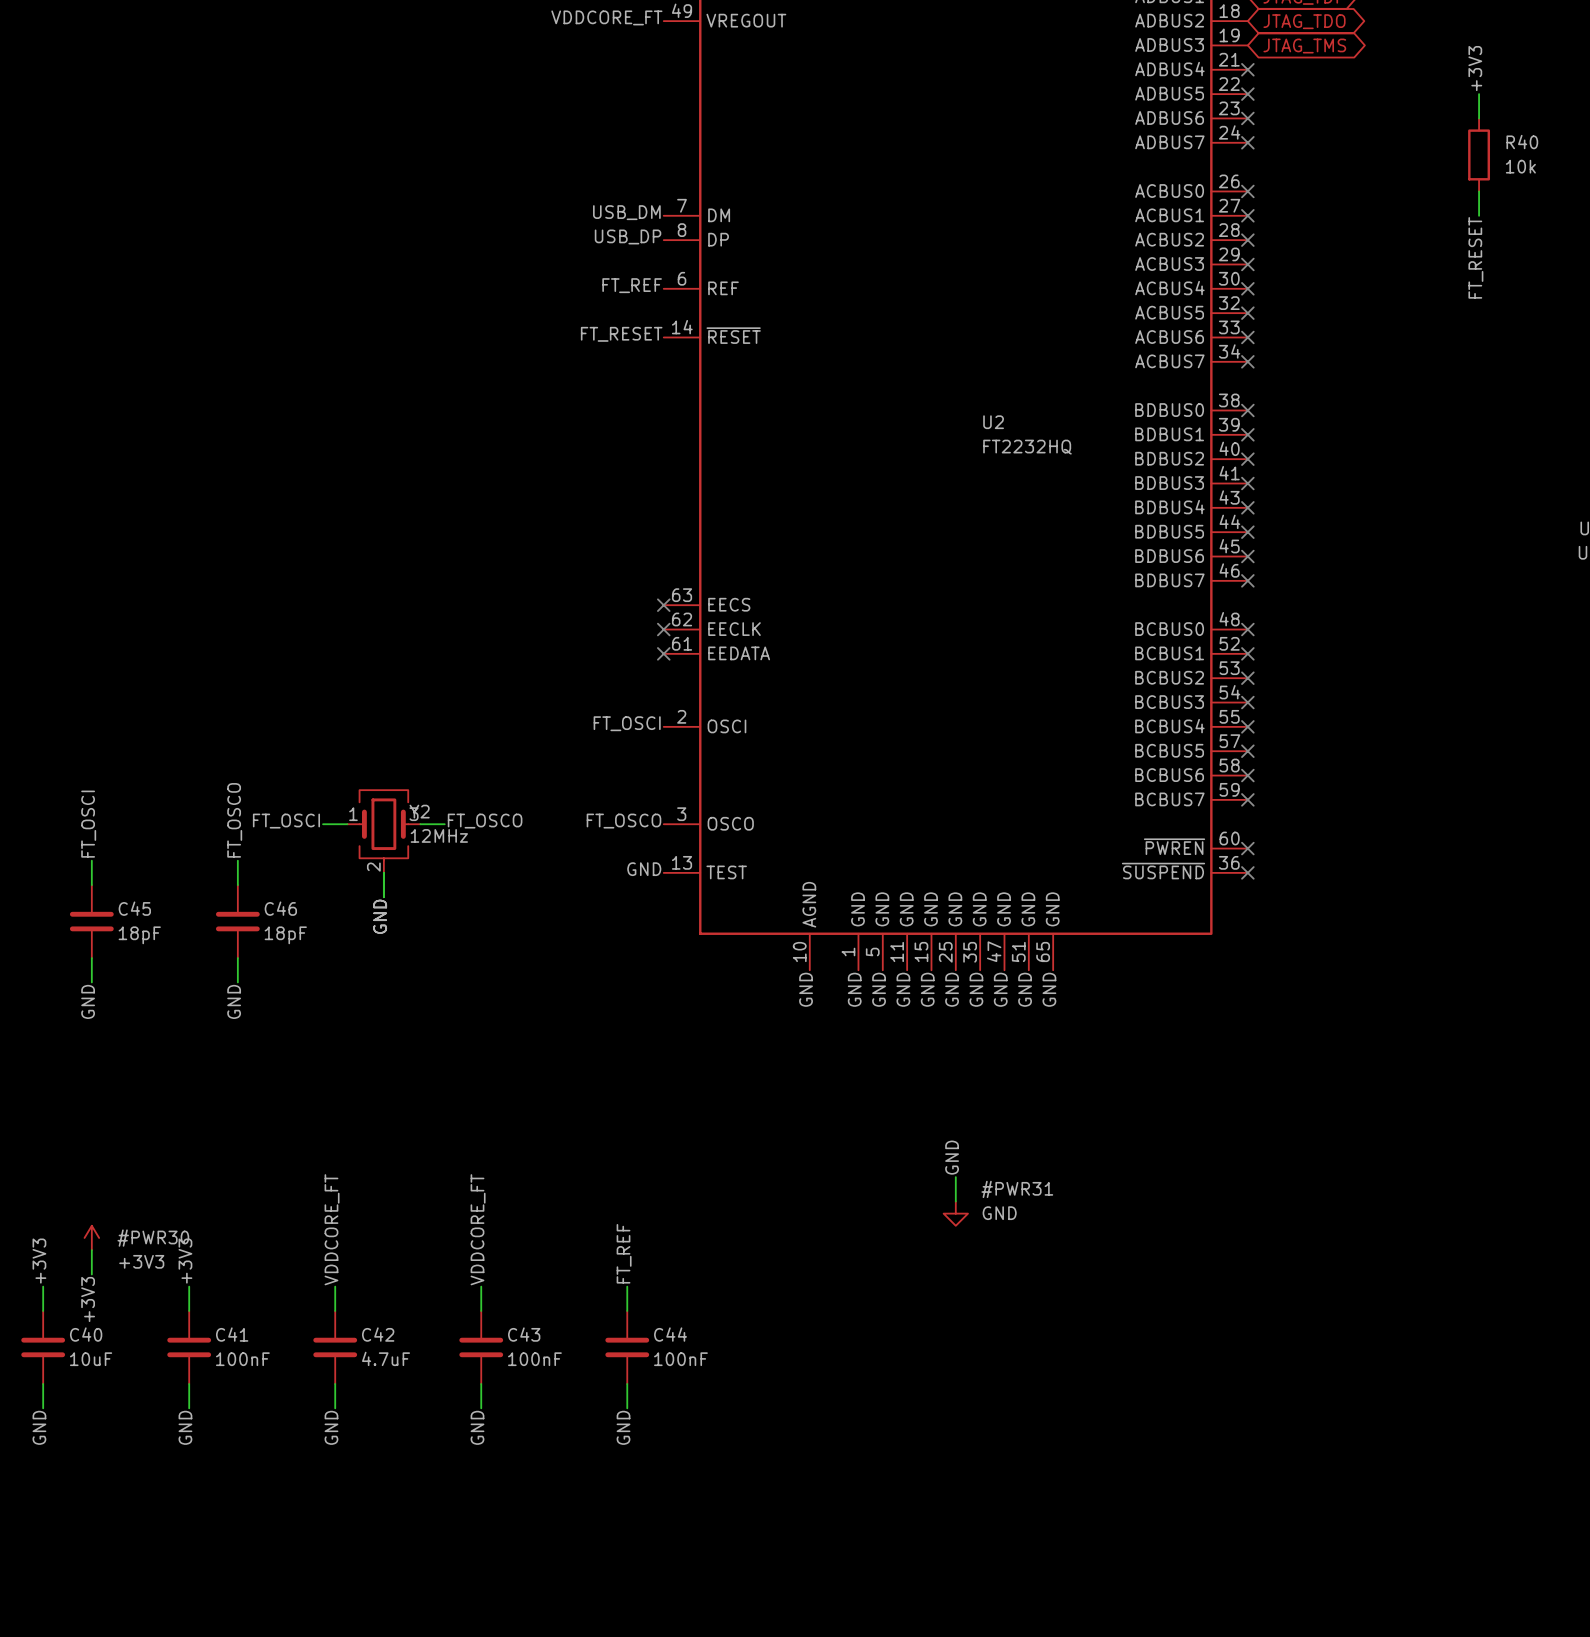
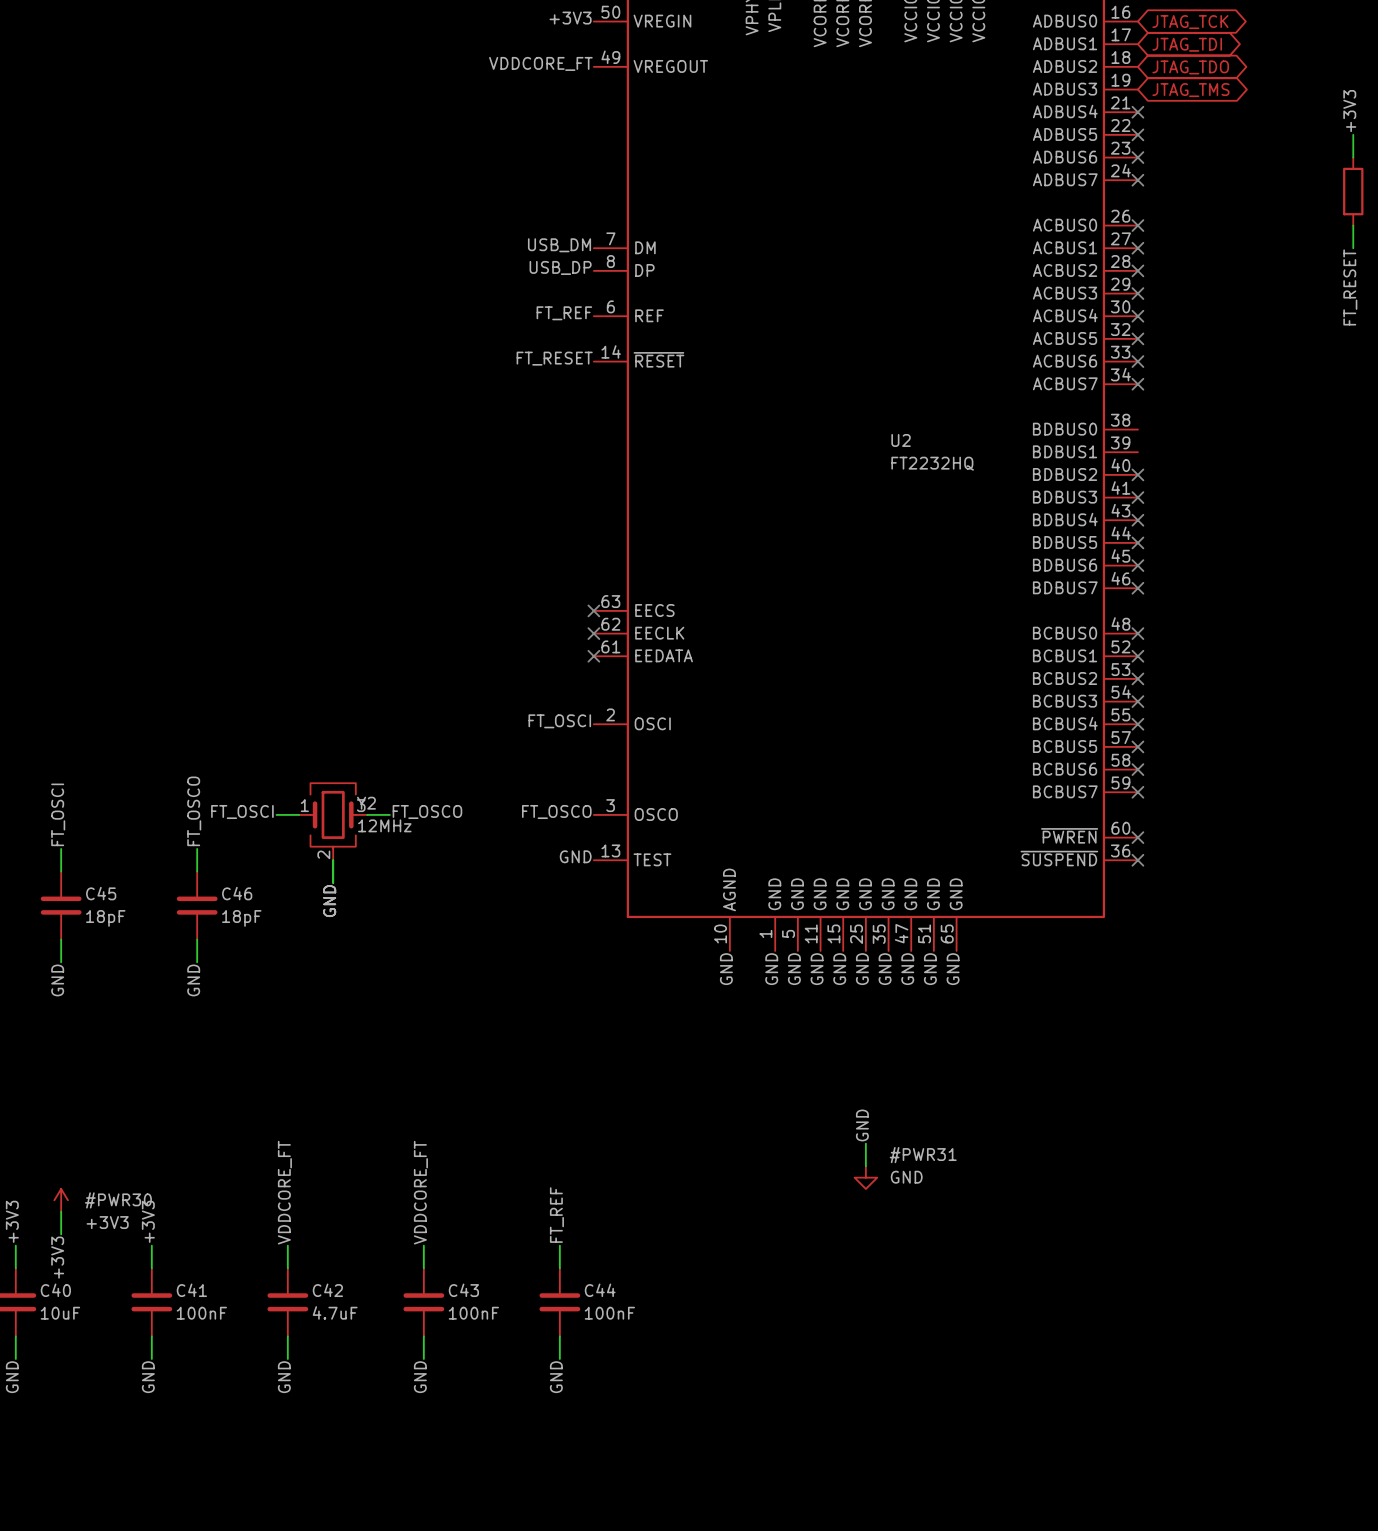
no-connect mark: (1247, 410) -> none
no-connect mark: (1247, 434) -> none

